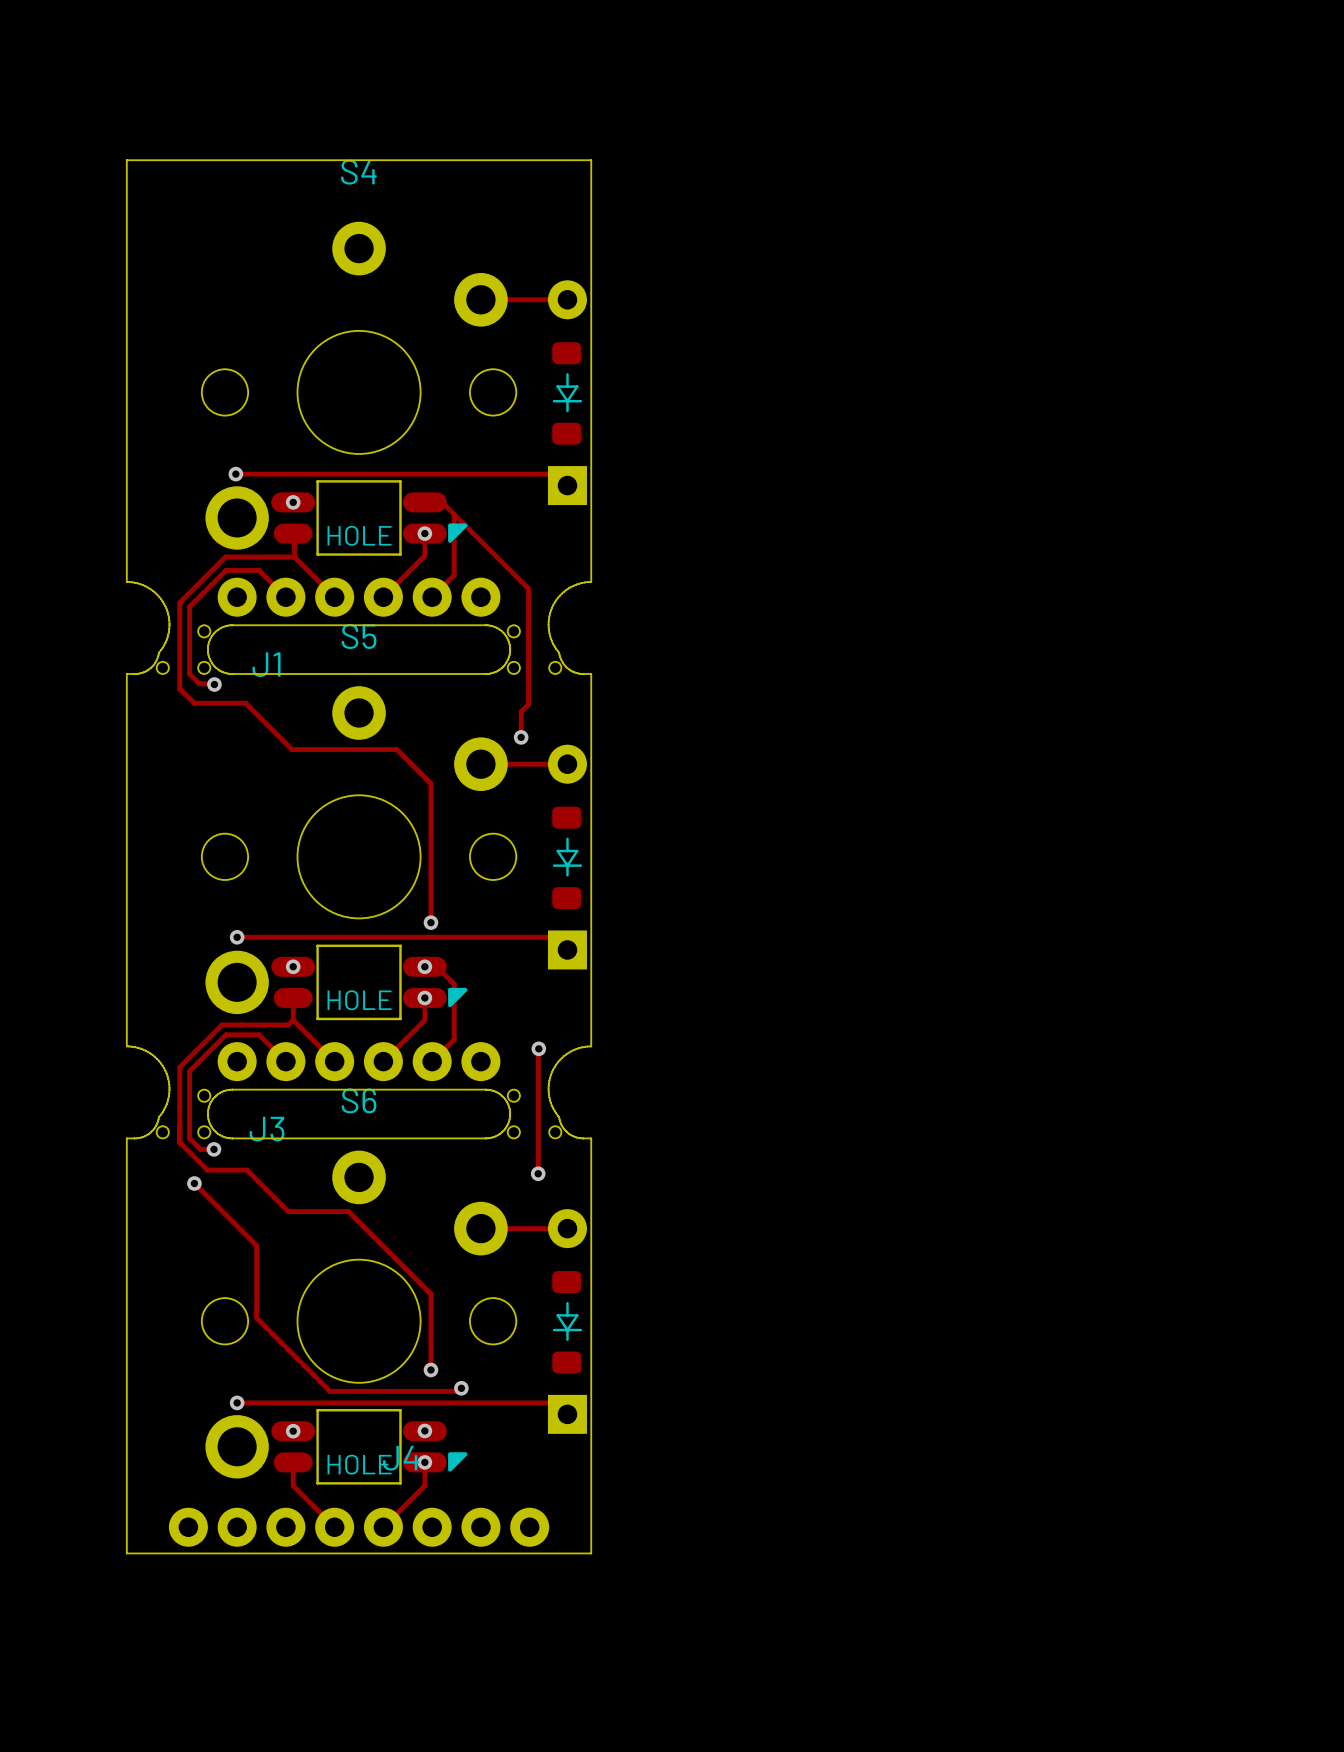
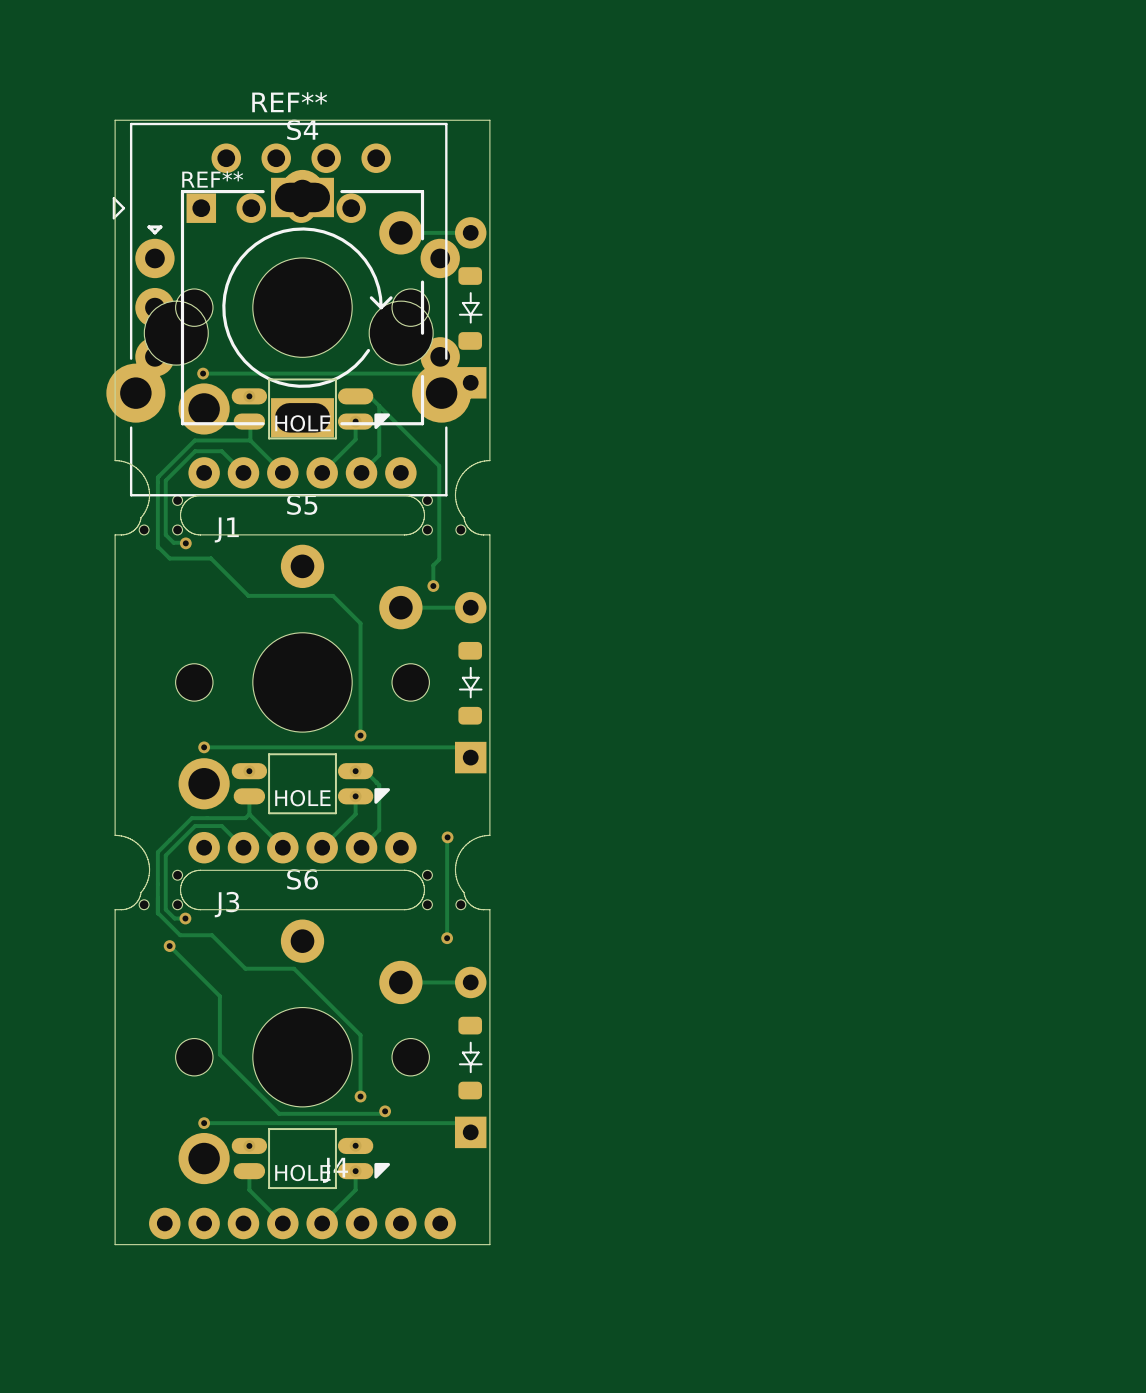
REF**: none -> (297, 307)
REF**: none -> (288, 309)

